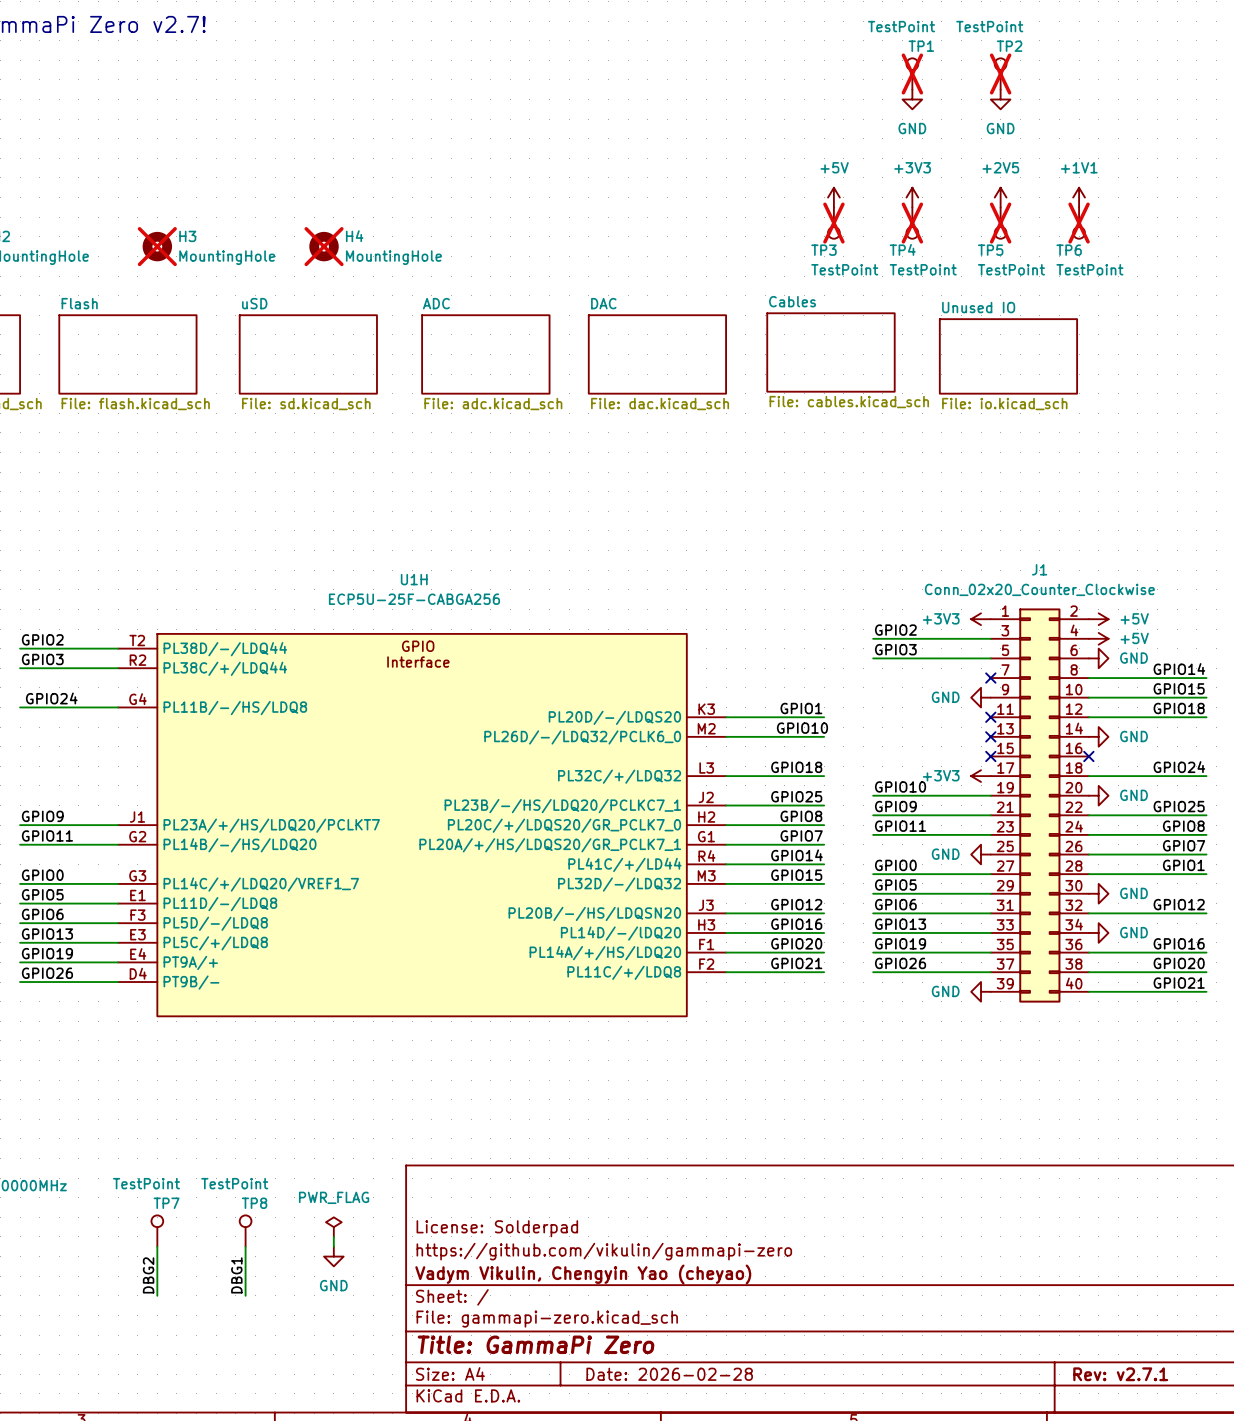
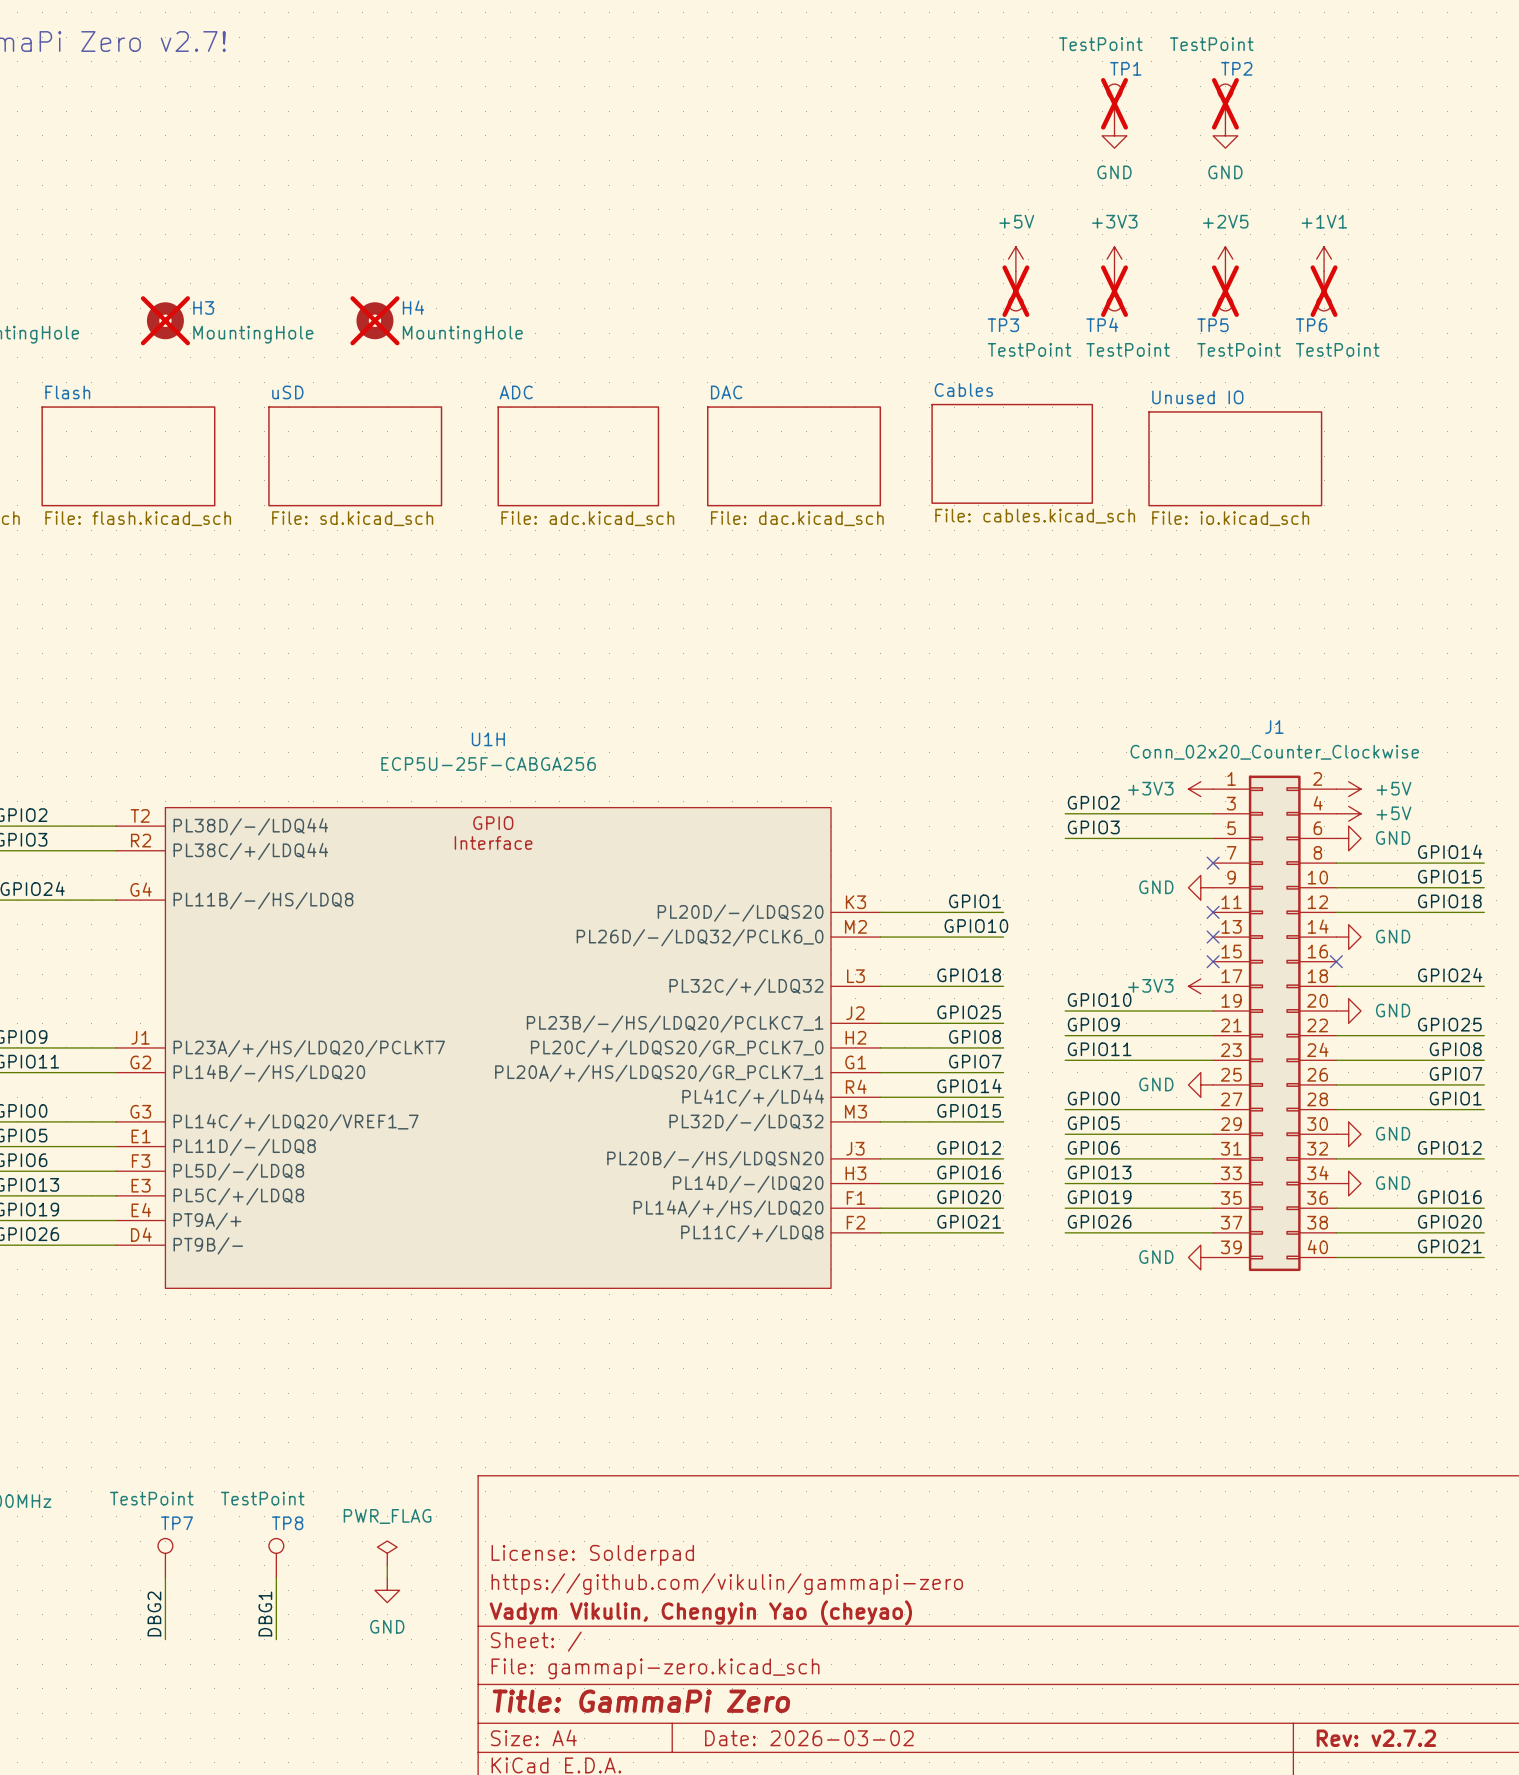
title block: Date: 2026-02-28 (669, 1374) -> Date: 2026-03-02 (809, 1738)
title block: Rev: v2.7.1 (1120, 1374) -> Rev: v2.7.2 (1376, 1738)

